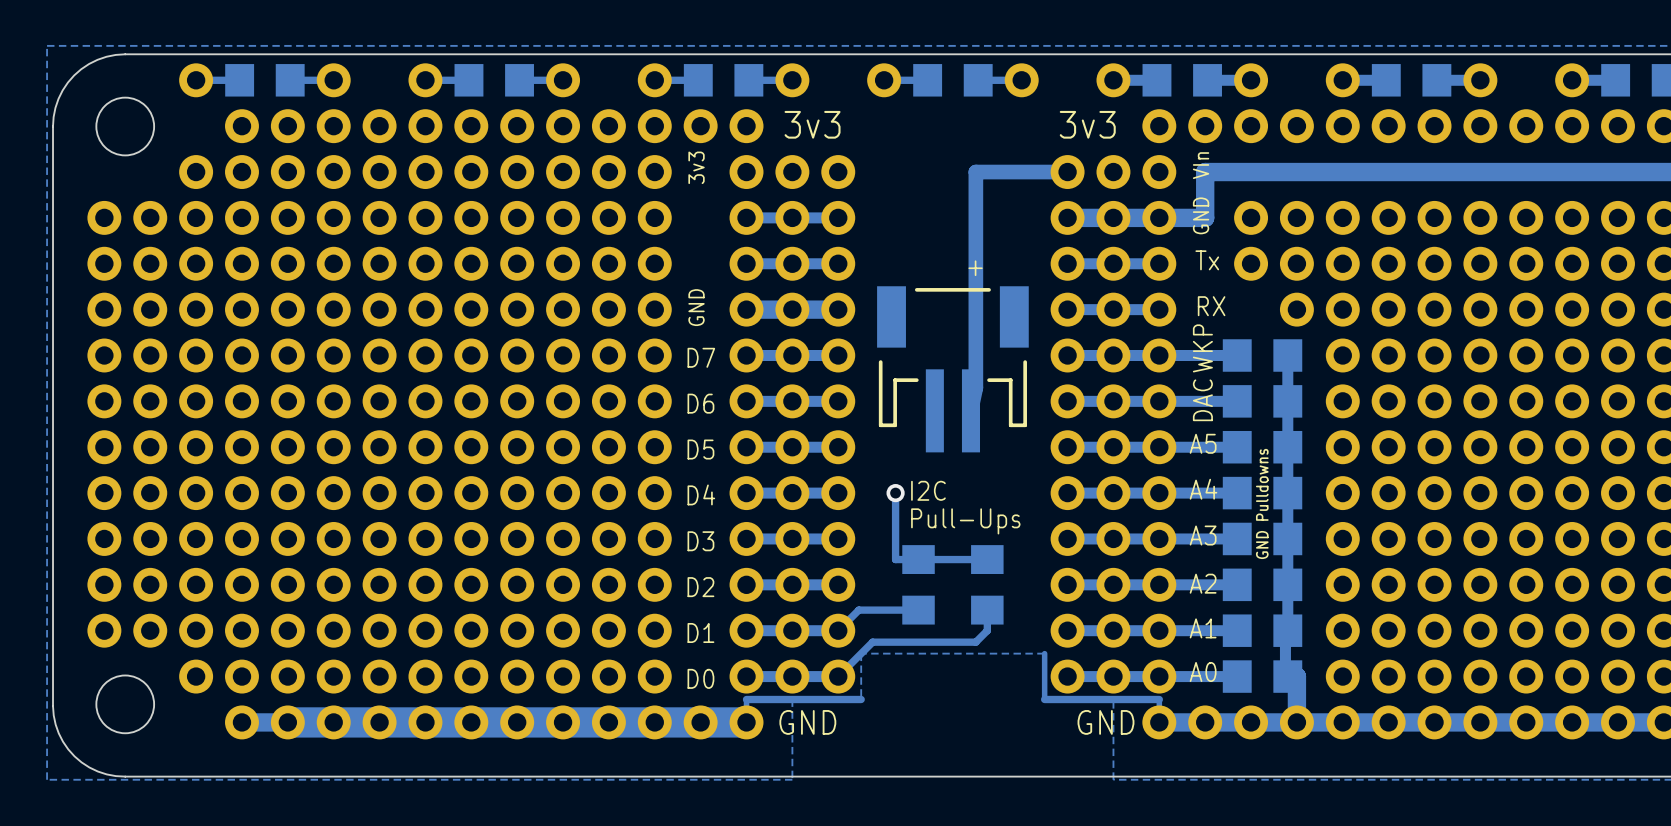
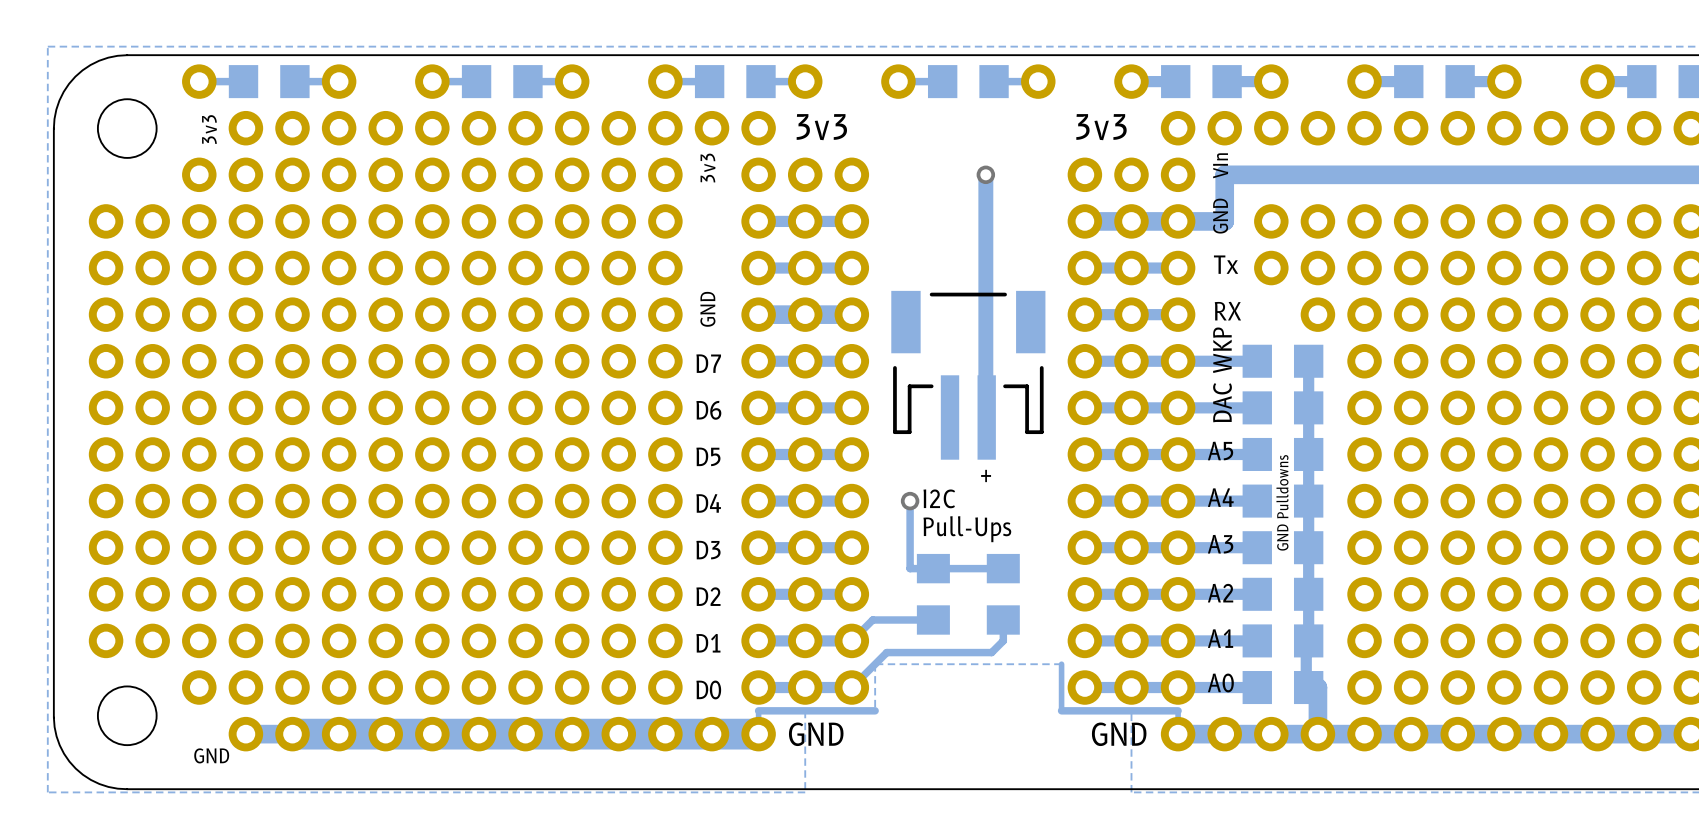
text: none -> 3v3 (209, 129)
via: none -> (985, 174)
track: (1067, 172) (975, 172) (975, 387) (970, 410) -> (985, 174) (986, 417)
text position: + (975, 268) -> + (986, 475)
text: none -> GND (211, 755)

